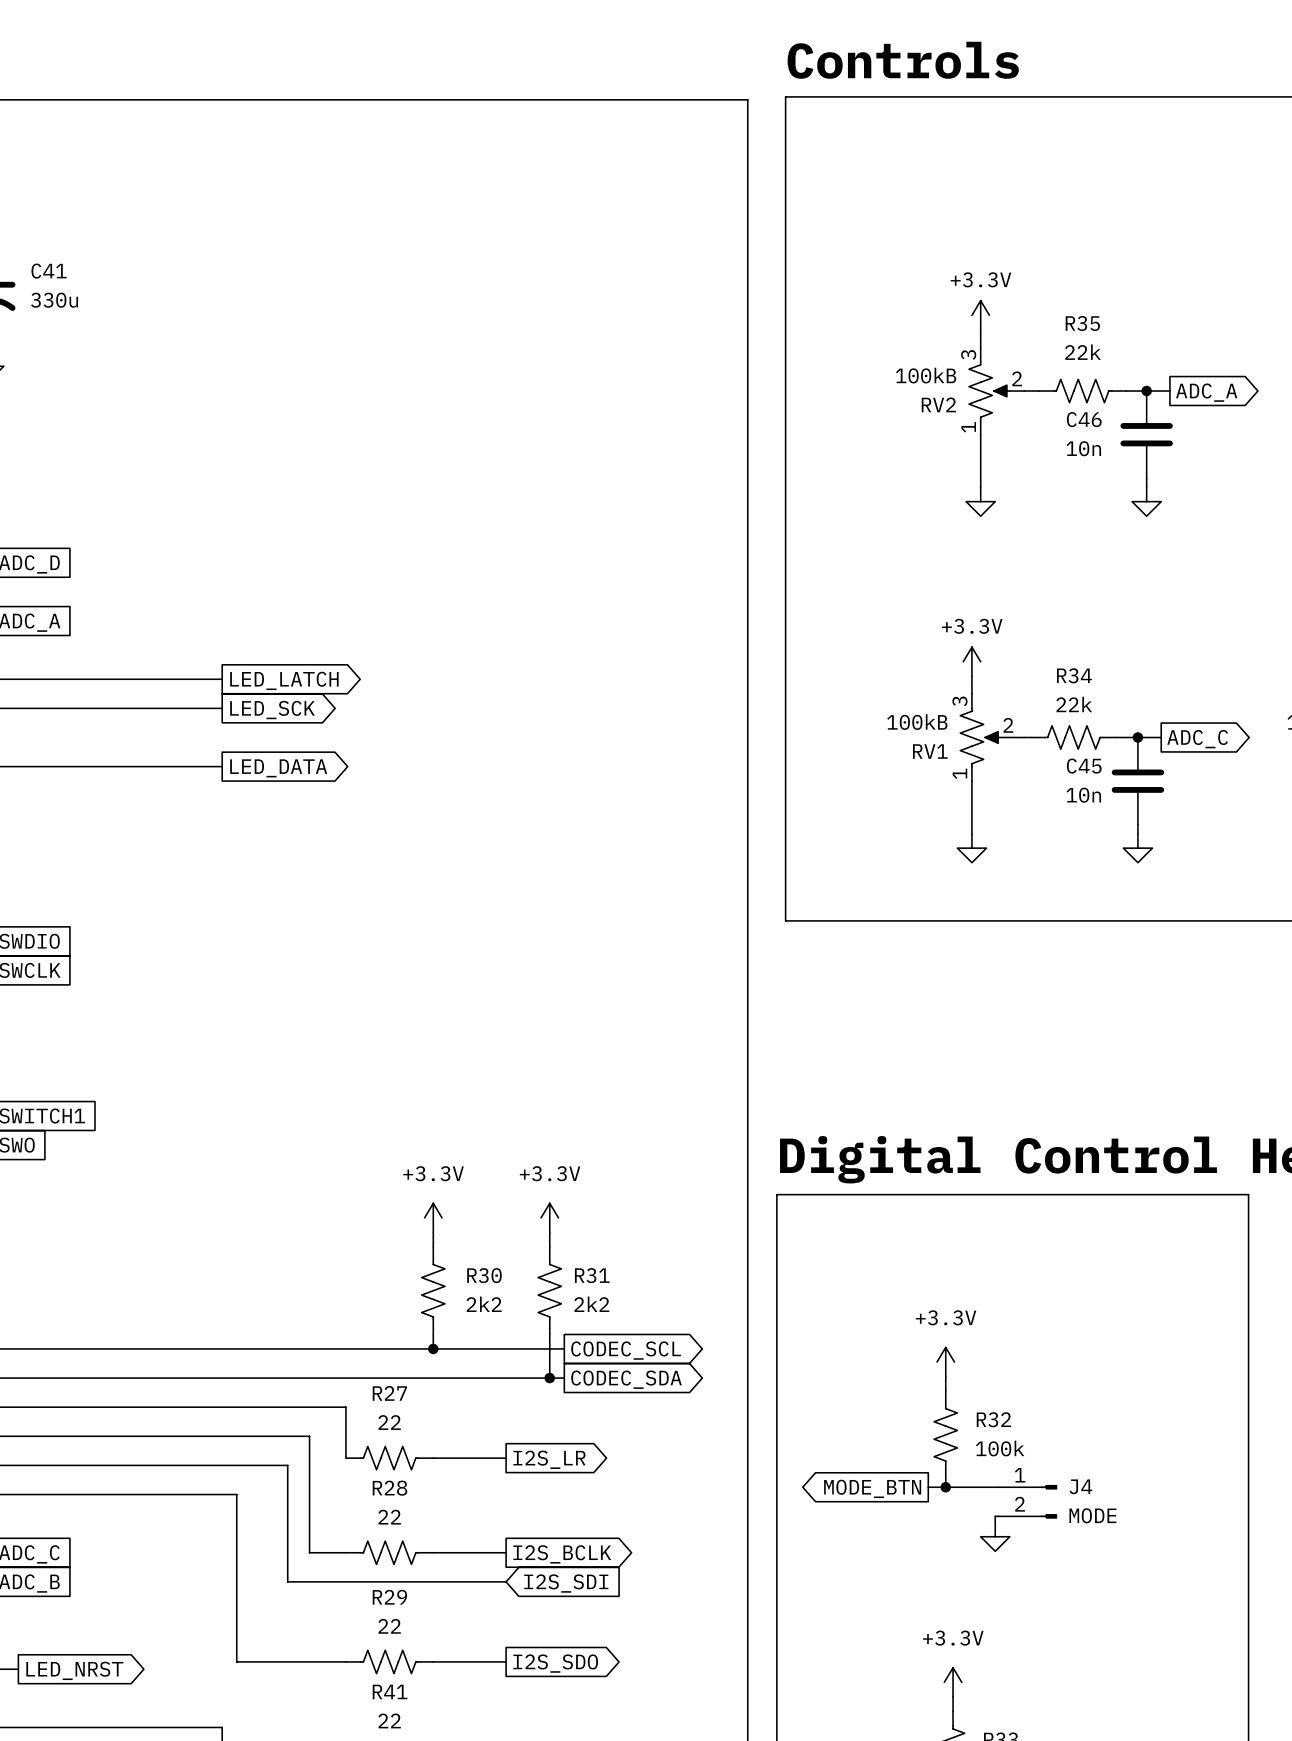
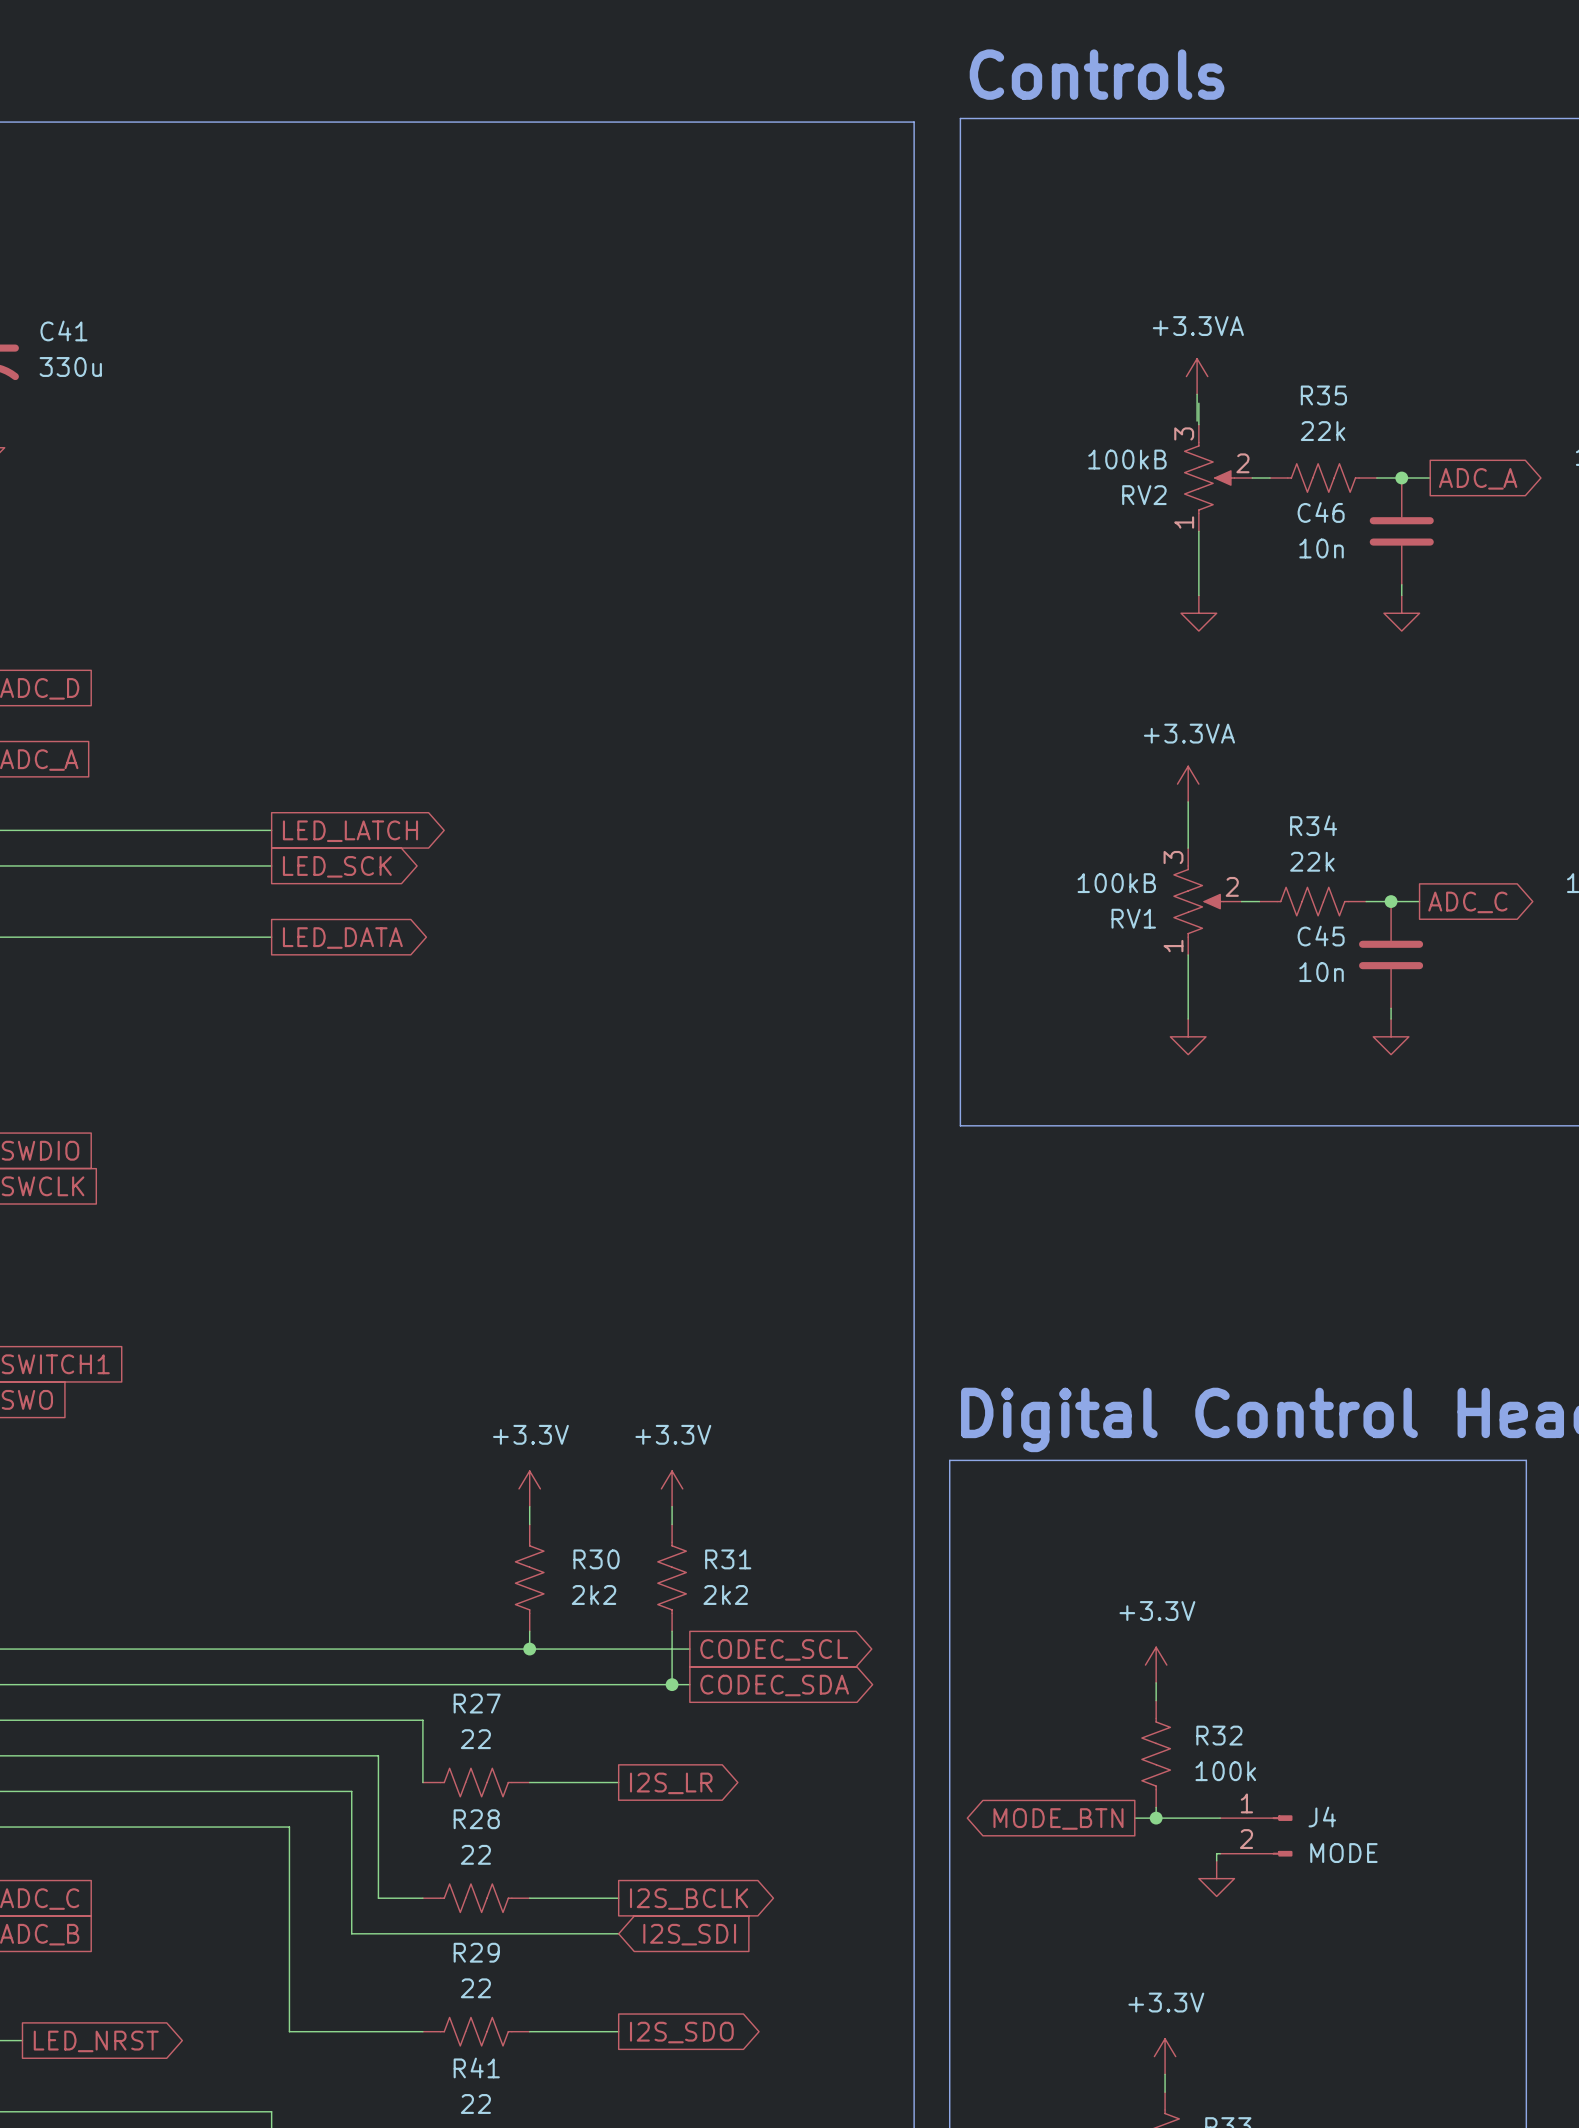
power symbol: +3.3V (980, 315) -> +3.3VA (1197, 376)
wire: none -> (1197, 394) (1197, 421)
power symbol: none -> +3.3VA (1188, 784)
power symbol: +3.3V (971, 661) -> none

